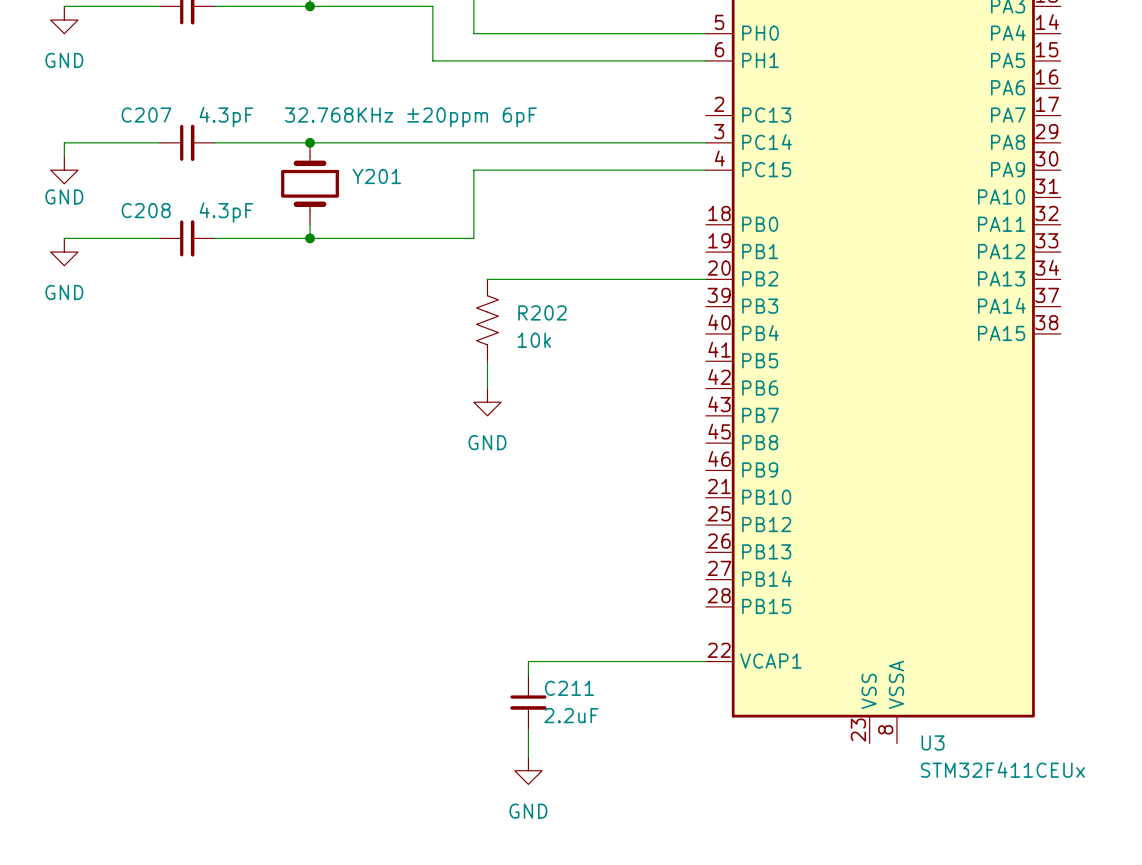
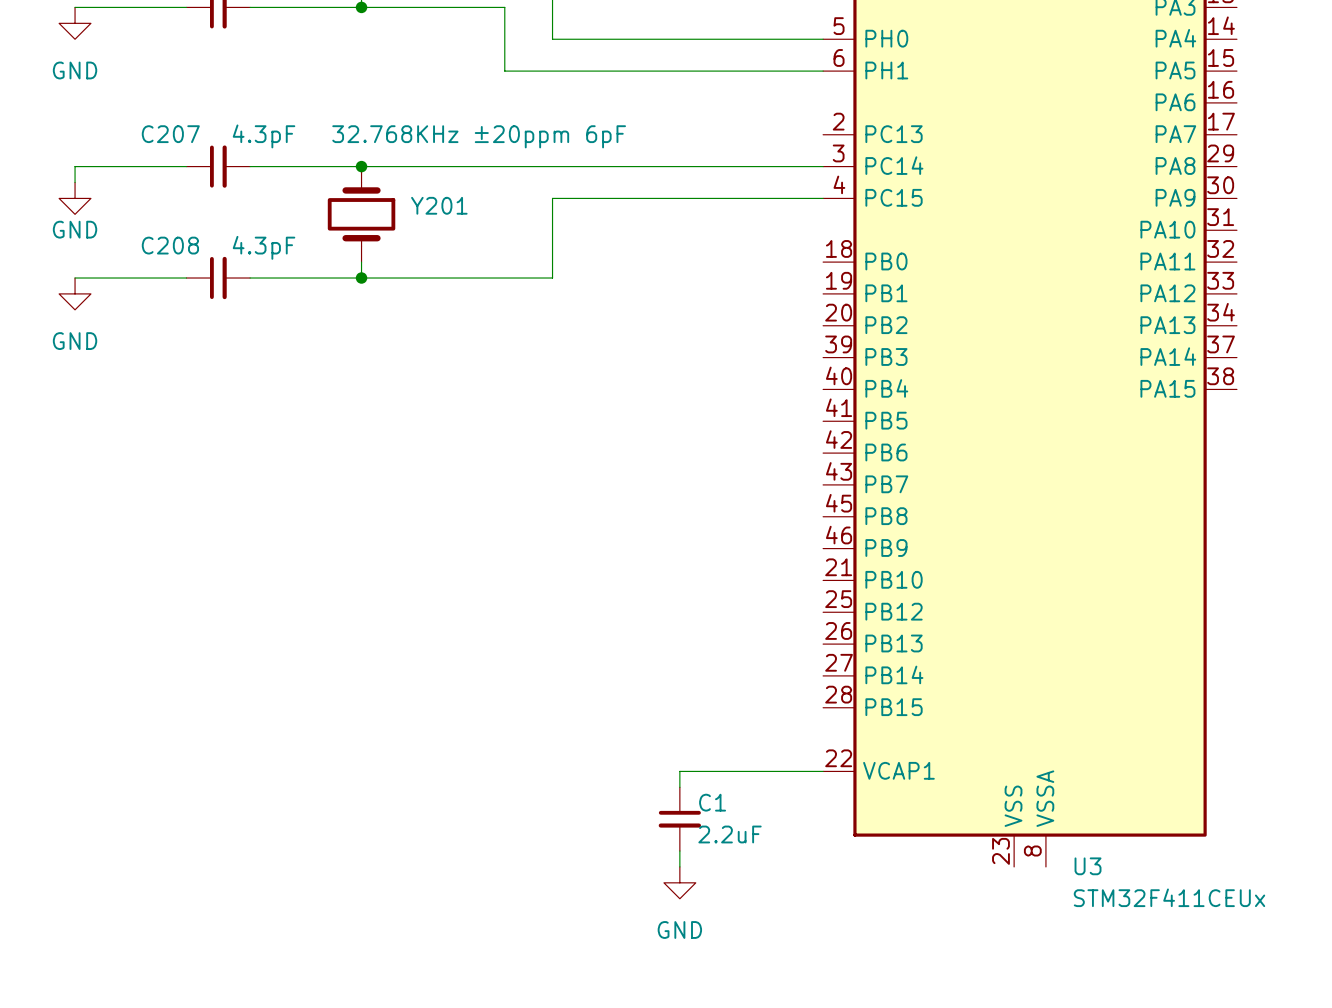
wire: (487, 279) (705, 279) -> none
R202: 10k (487, 320) -> none
wire: (487, 361) (487, 388) -> none
power symbol: GND (487, 402) -> none
wire: (583, 661) (528, 661) (528, 675) -> (679, 771) (679, 787)
C211: 2.2uF (528, 702) -> none
C1: none -> 2.2uF (679, 819)
wire: (528, 729) (528, 757) -> none
wire: none -> (679, 851) (679, 866)
power symbol position: GND (528, 770) -> GND (679, 882)

